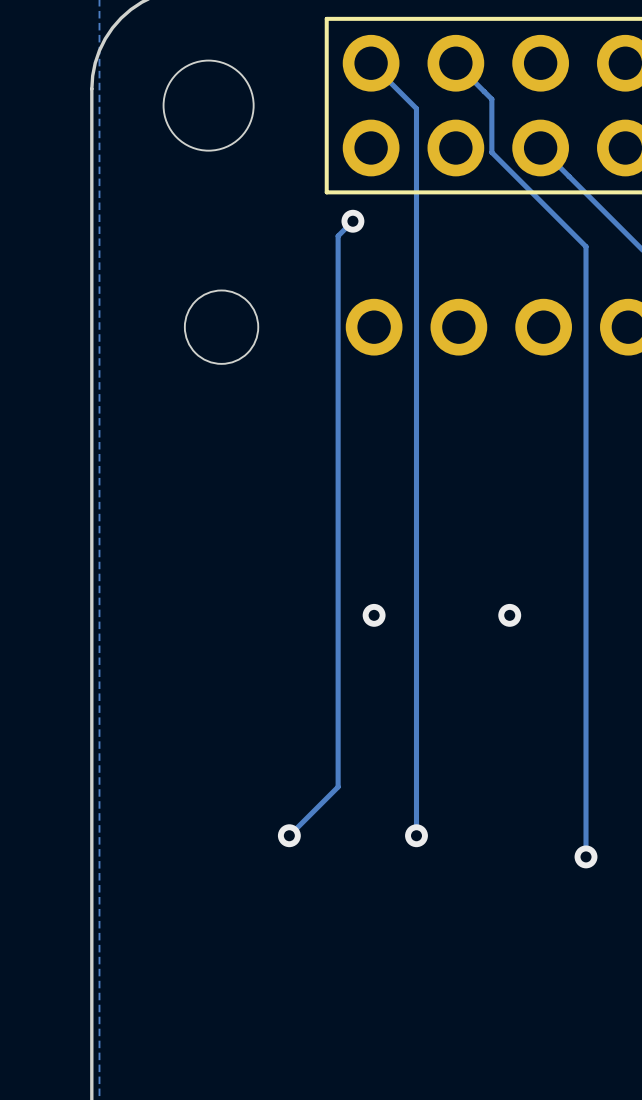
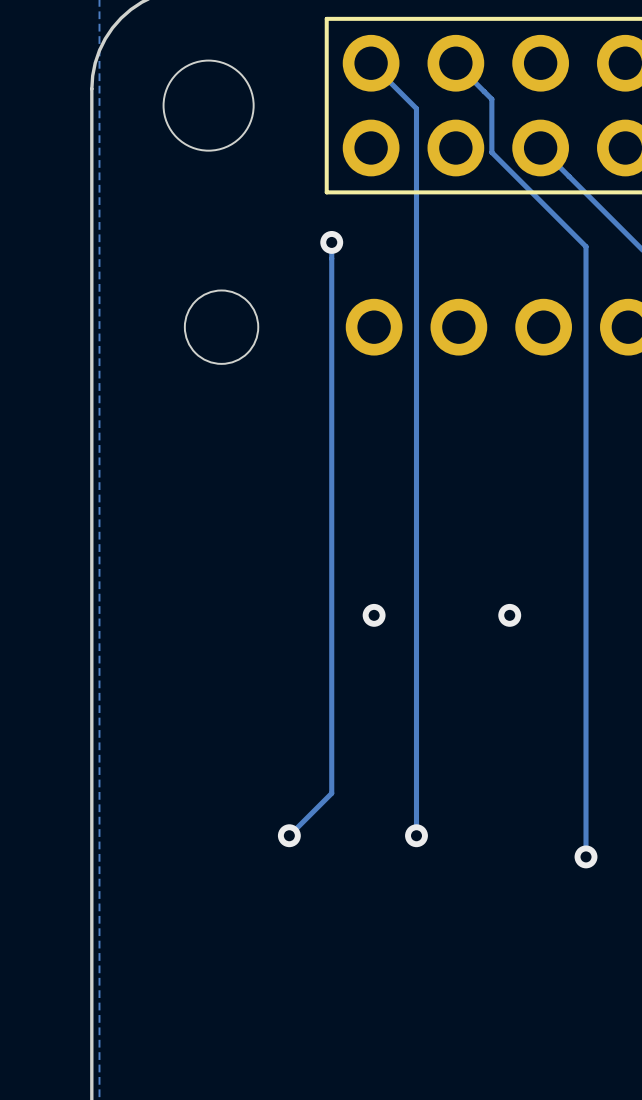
track: (352, 221) (338, 236) (338, 786) (331, 793) -> (331, 242) (331, 793)
via position: (352, 221) -> (331, 242)

